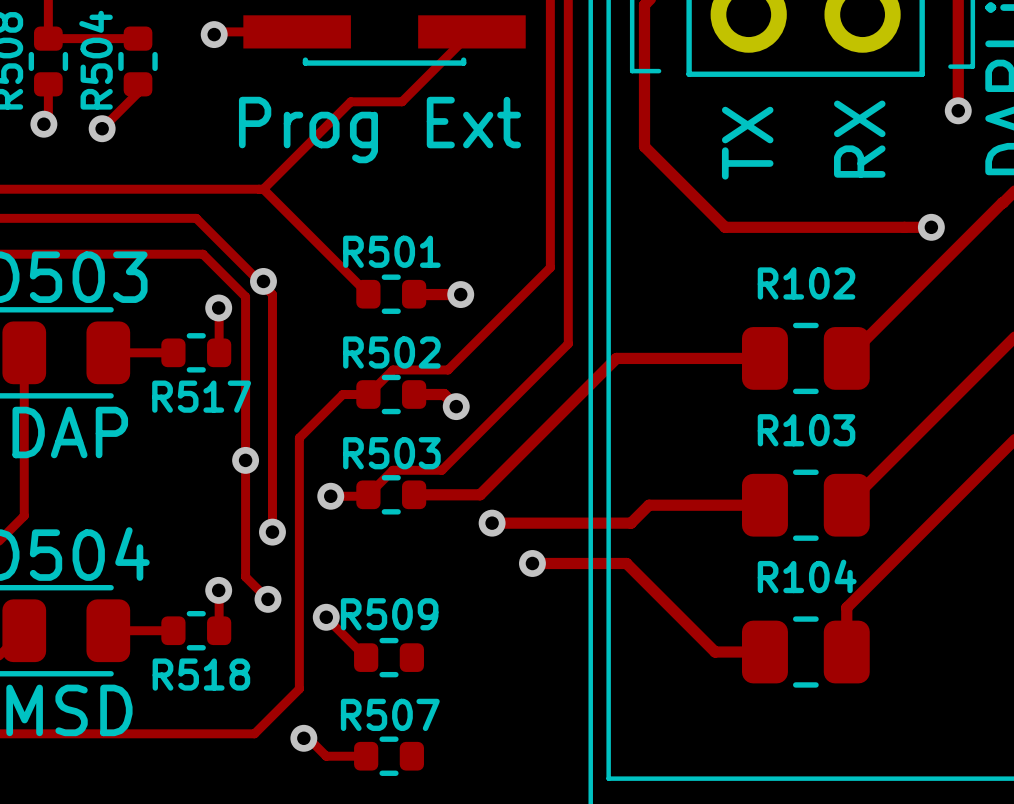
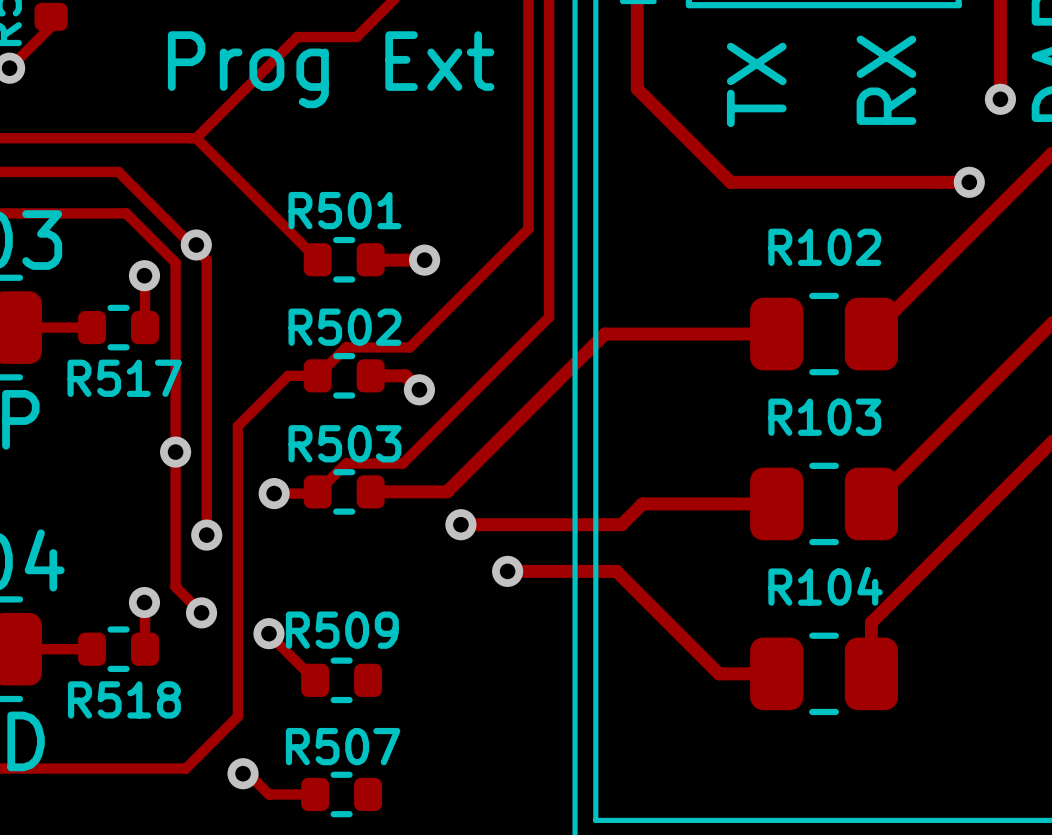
track: none -> (1000, 47) (1000, 99)
via position: (958, 110) -> (1000, 99)

